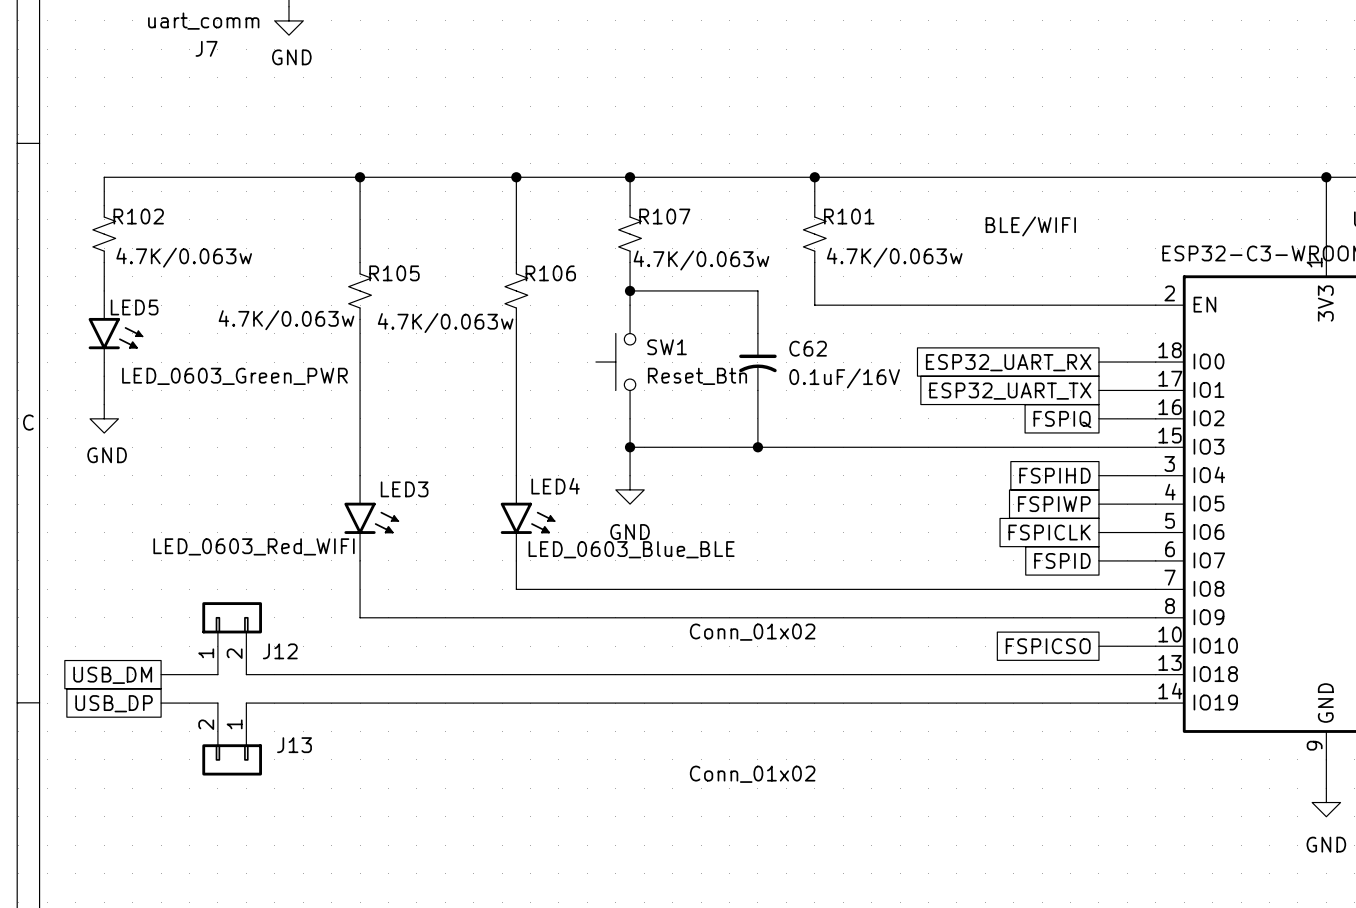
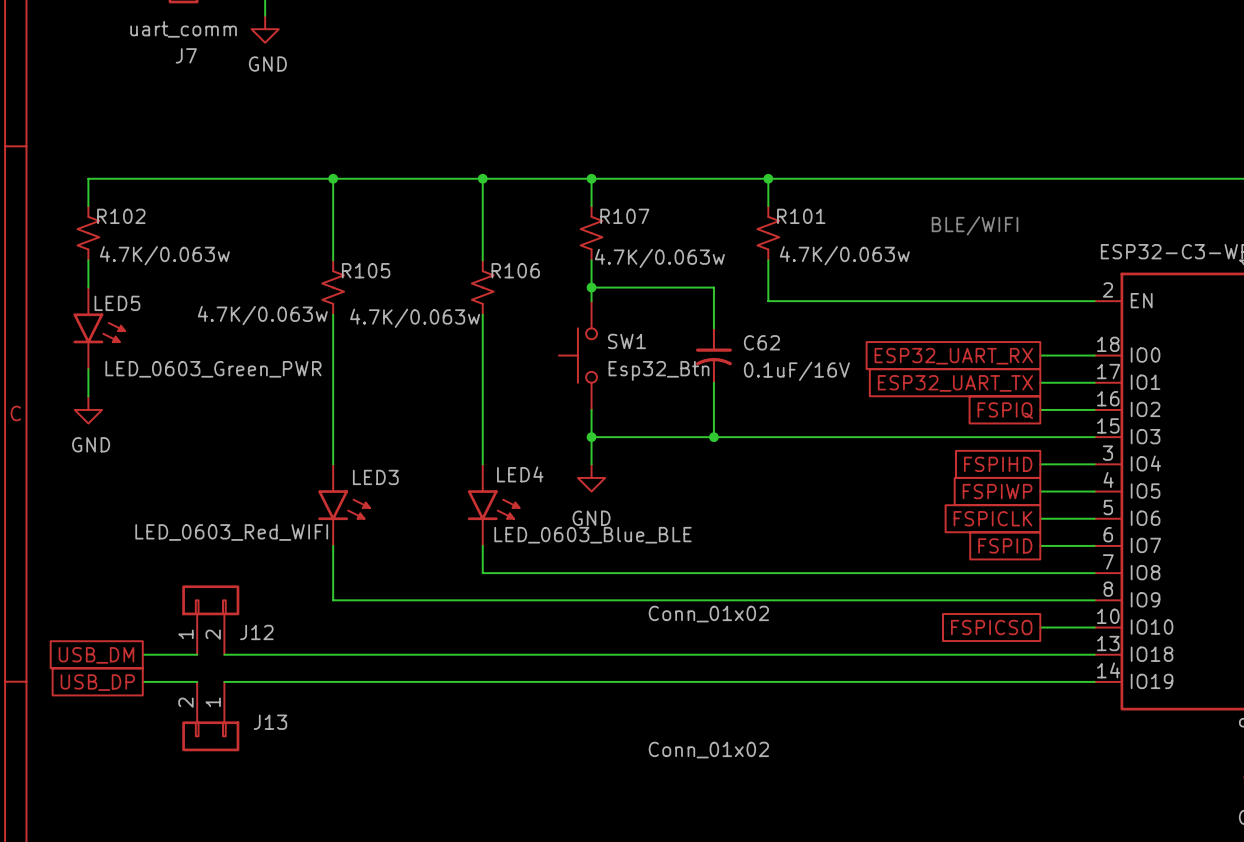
SW1 value: Reset_Btn (697, 376) -> Esp32_Btn (658, 370)

